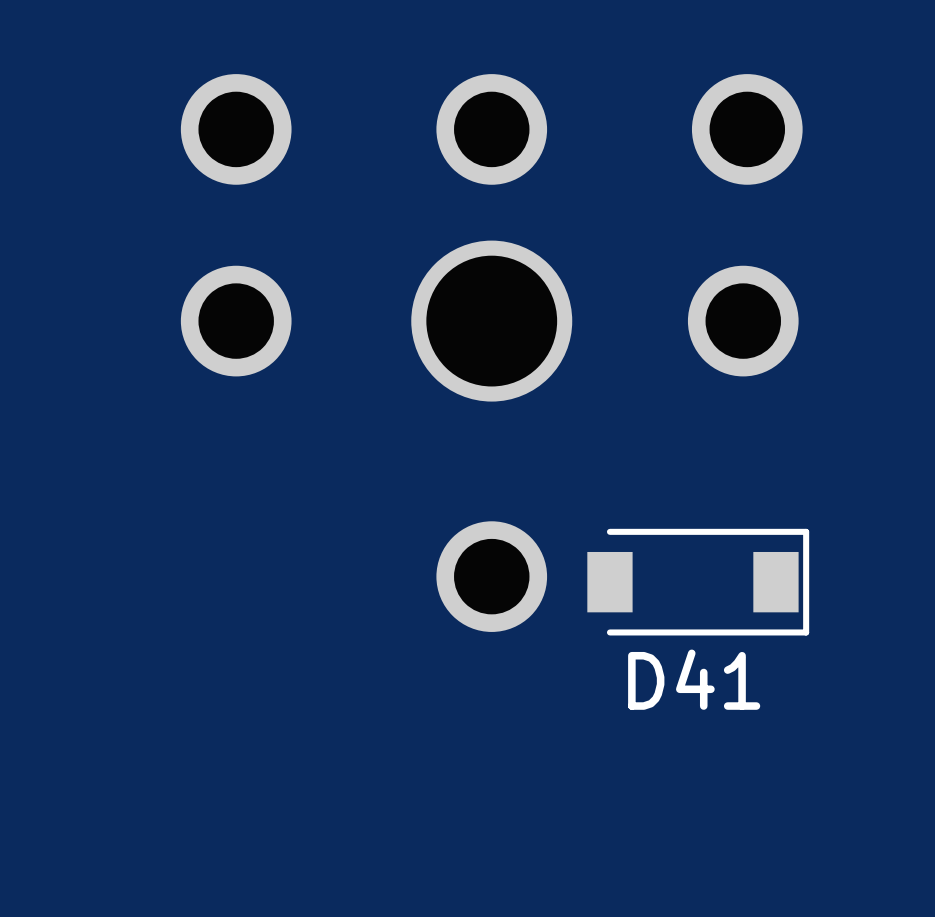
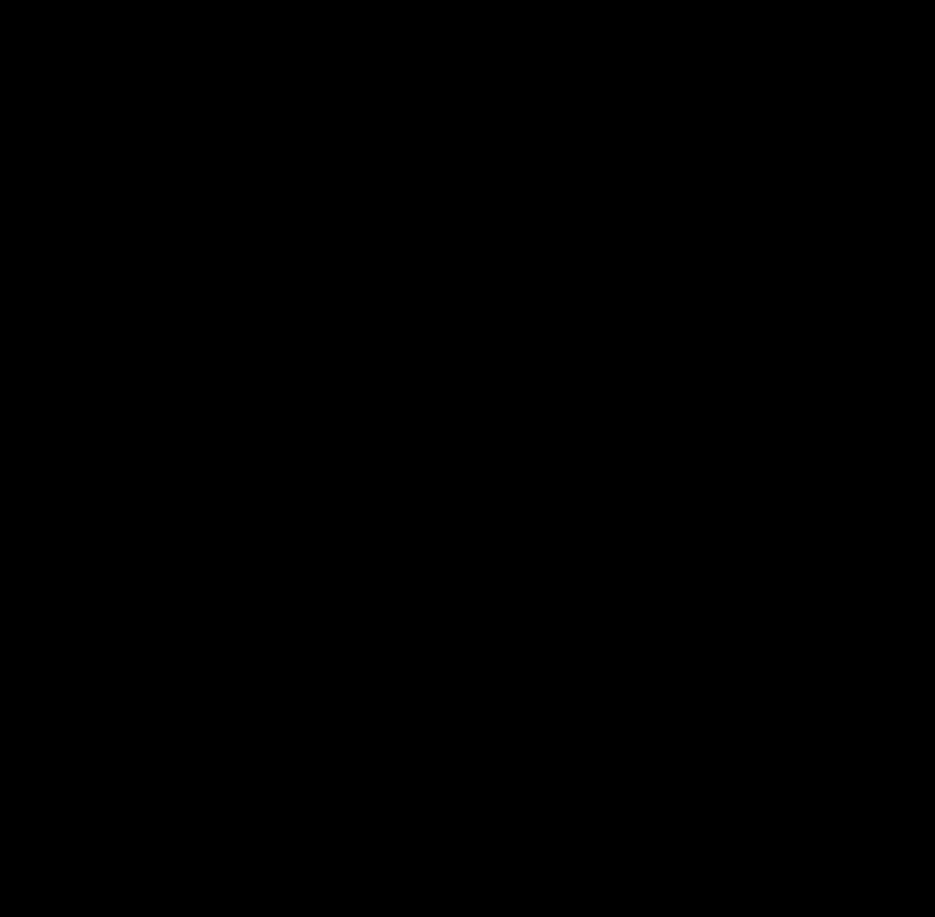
part: (491, 353) -> none
D41: (698, 582) -> none

